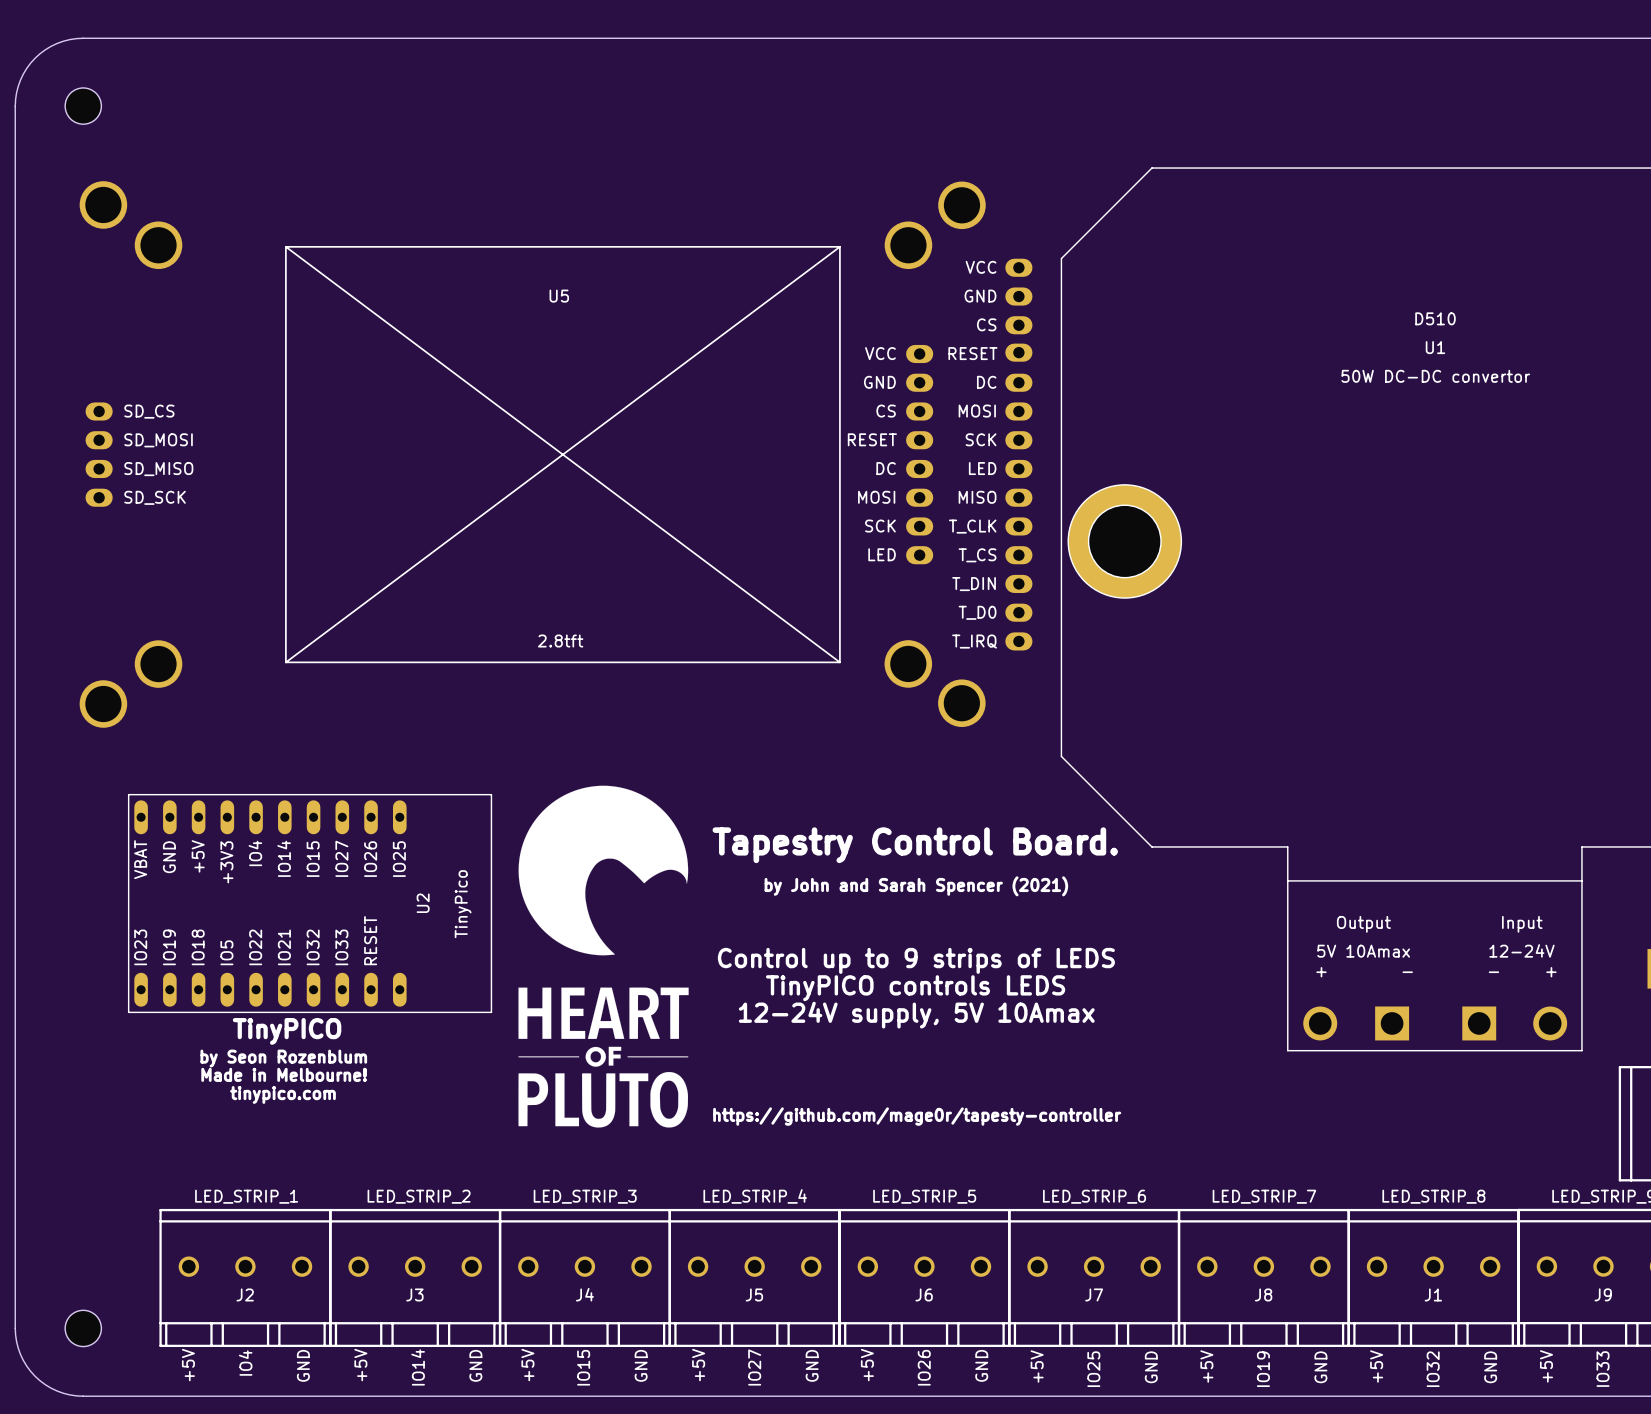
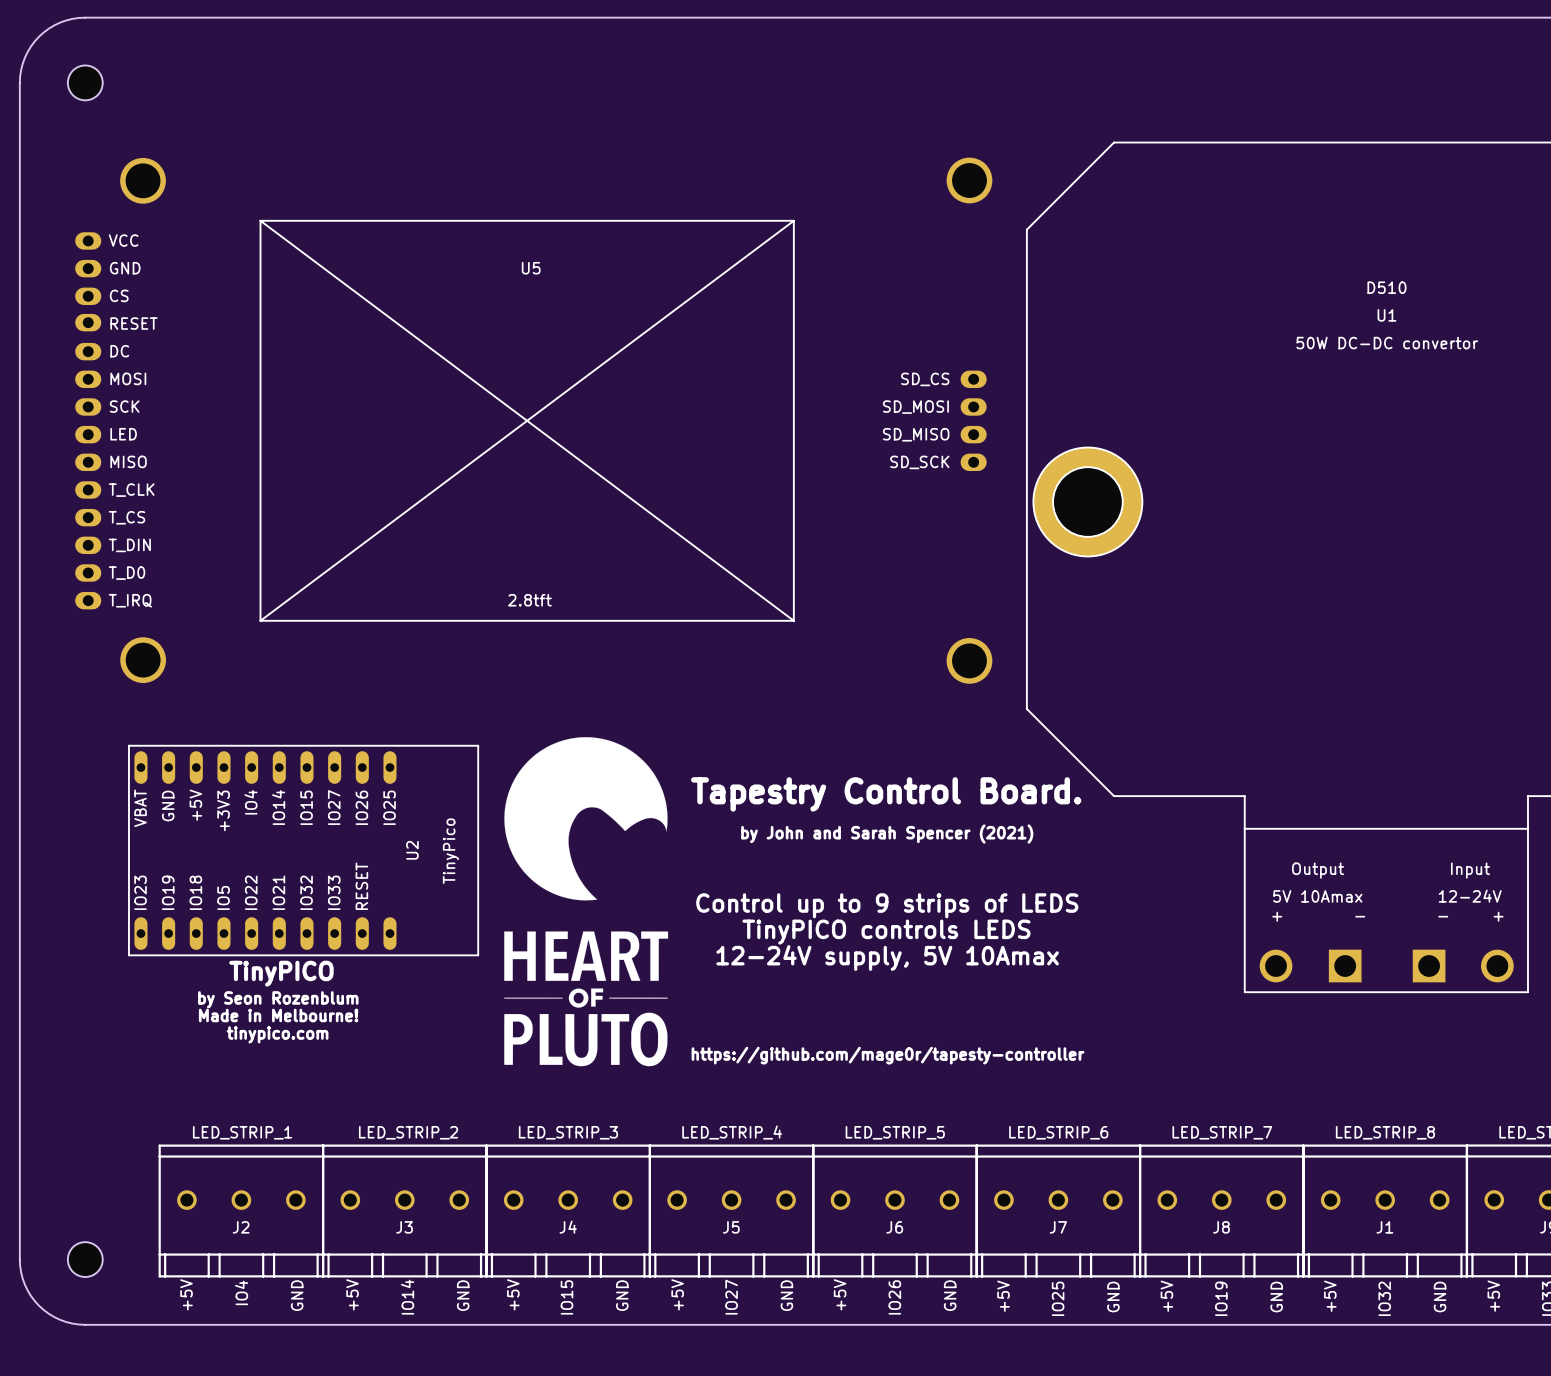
U5 footprint: [79, 181, 1033, 728] -> [75, 157, 993, 684]

